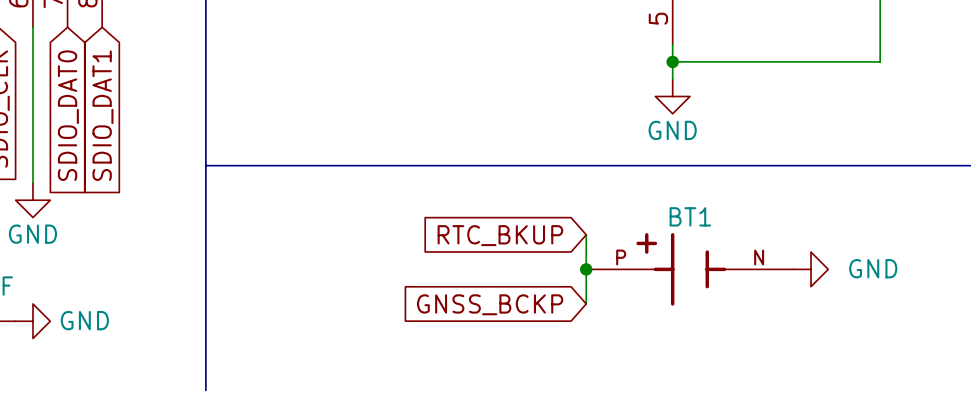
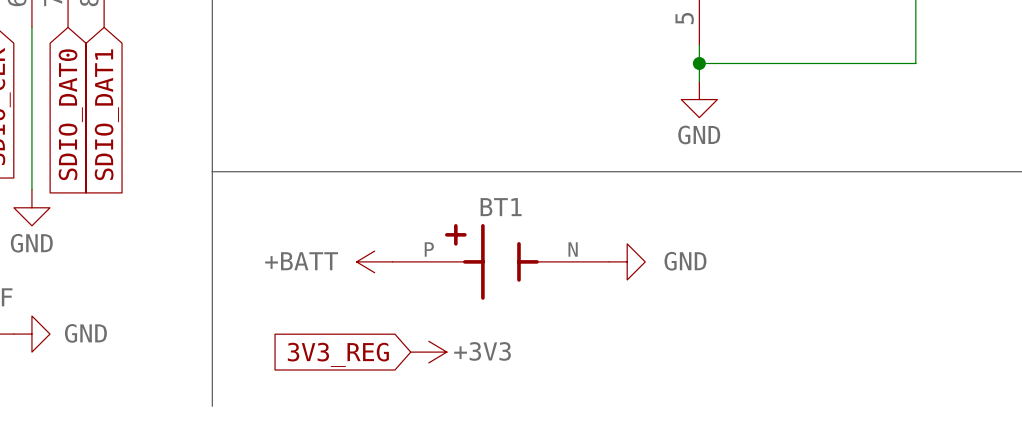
wire: (586, 234) (586, 303) -> none
global label: RTC_BKUP (500, 235) -> none
power symbol: none -> +BATT (374, 261)
junction: (586, 269) -> none
BT1 position: (689, 269) -> (500, 261)
power symbol position: GND (811, 269) -> GND (627, 261)
global label: GNSS_BCKP (490, 304) -> none
power symbol: none -> +3V3 (428, 352)
global label: none -> 3V3_REG (338, 354)

